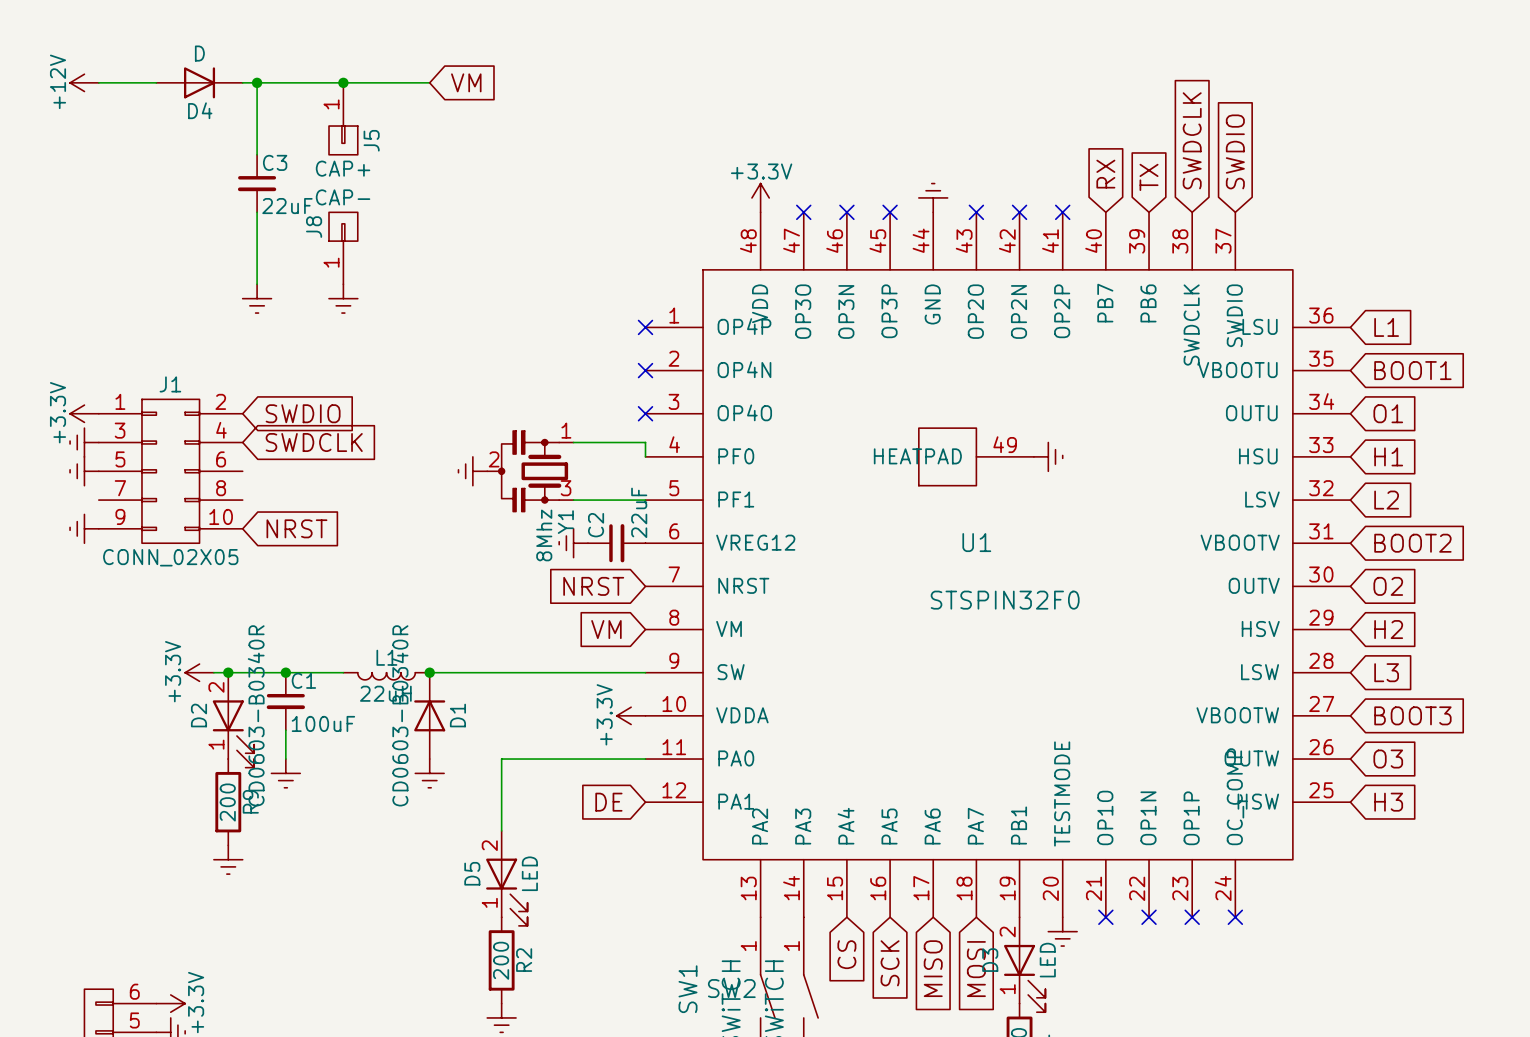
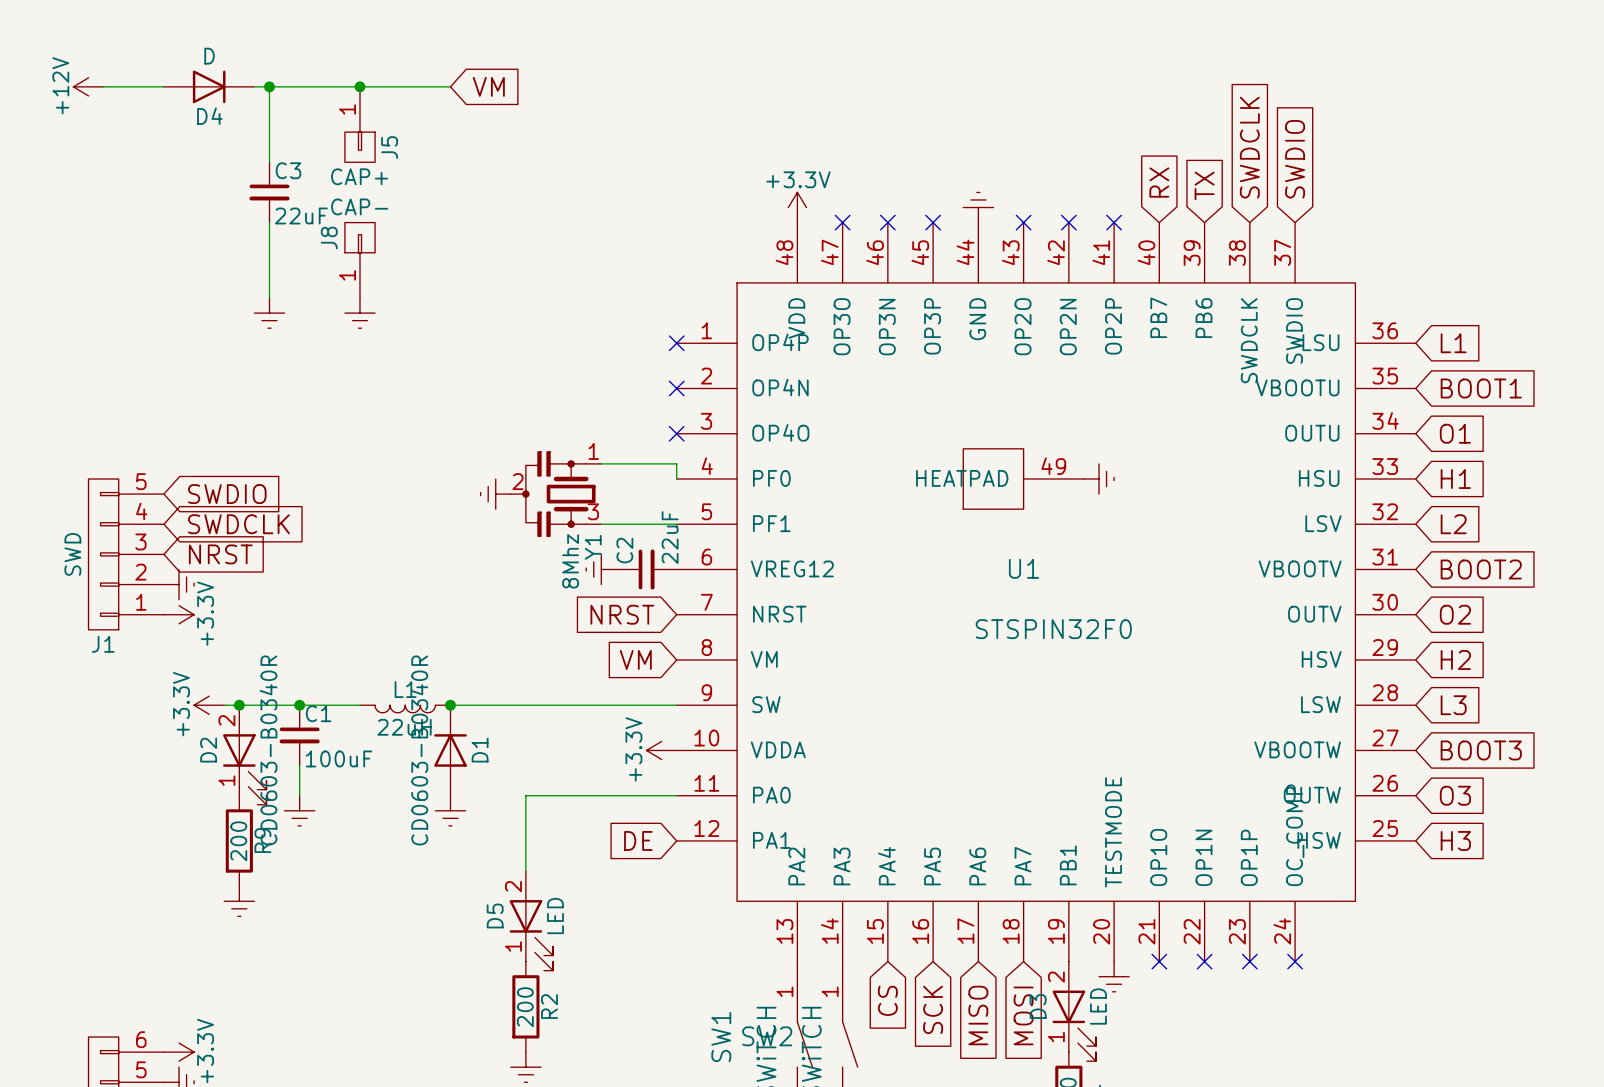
J1 name position: J1 (170, 384) -> J1 (103, 644)
J1 symbol: [98, 399, 243, 544] -> [88, 478, 164, 630]
power symbol rotation: 0° (84, 413) -> 180° (179, 614)
power symbol position: +3.3V (84, 413) -> +3.3V (179, 614)
global label position: SWDIO (303, 413) -> SWDIO (227, 494)
power symbol: (84, 442) -> none
global label position: SWDCLK (314, 442) -> SWDCLK (238, 524)
power symbol: (84, 471) -> none
power symbol: (84, 528) -> none
global label position: NRST (296, 528) -> NRST (220, 554)
power symbol: none -> (179, 584)
J1 value: CONN_02X05 (170, 557) -> SWD (72, 554)

